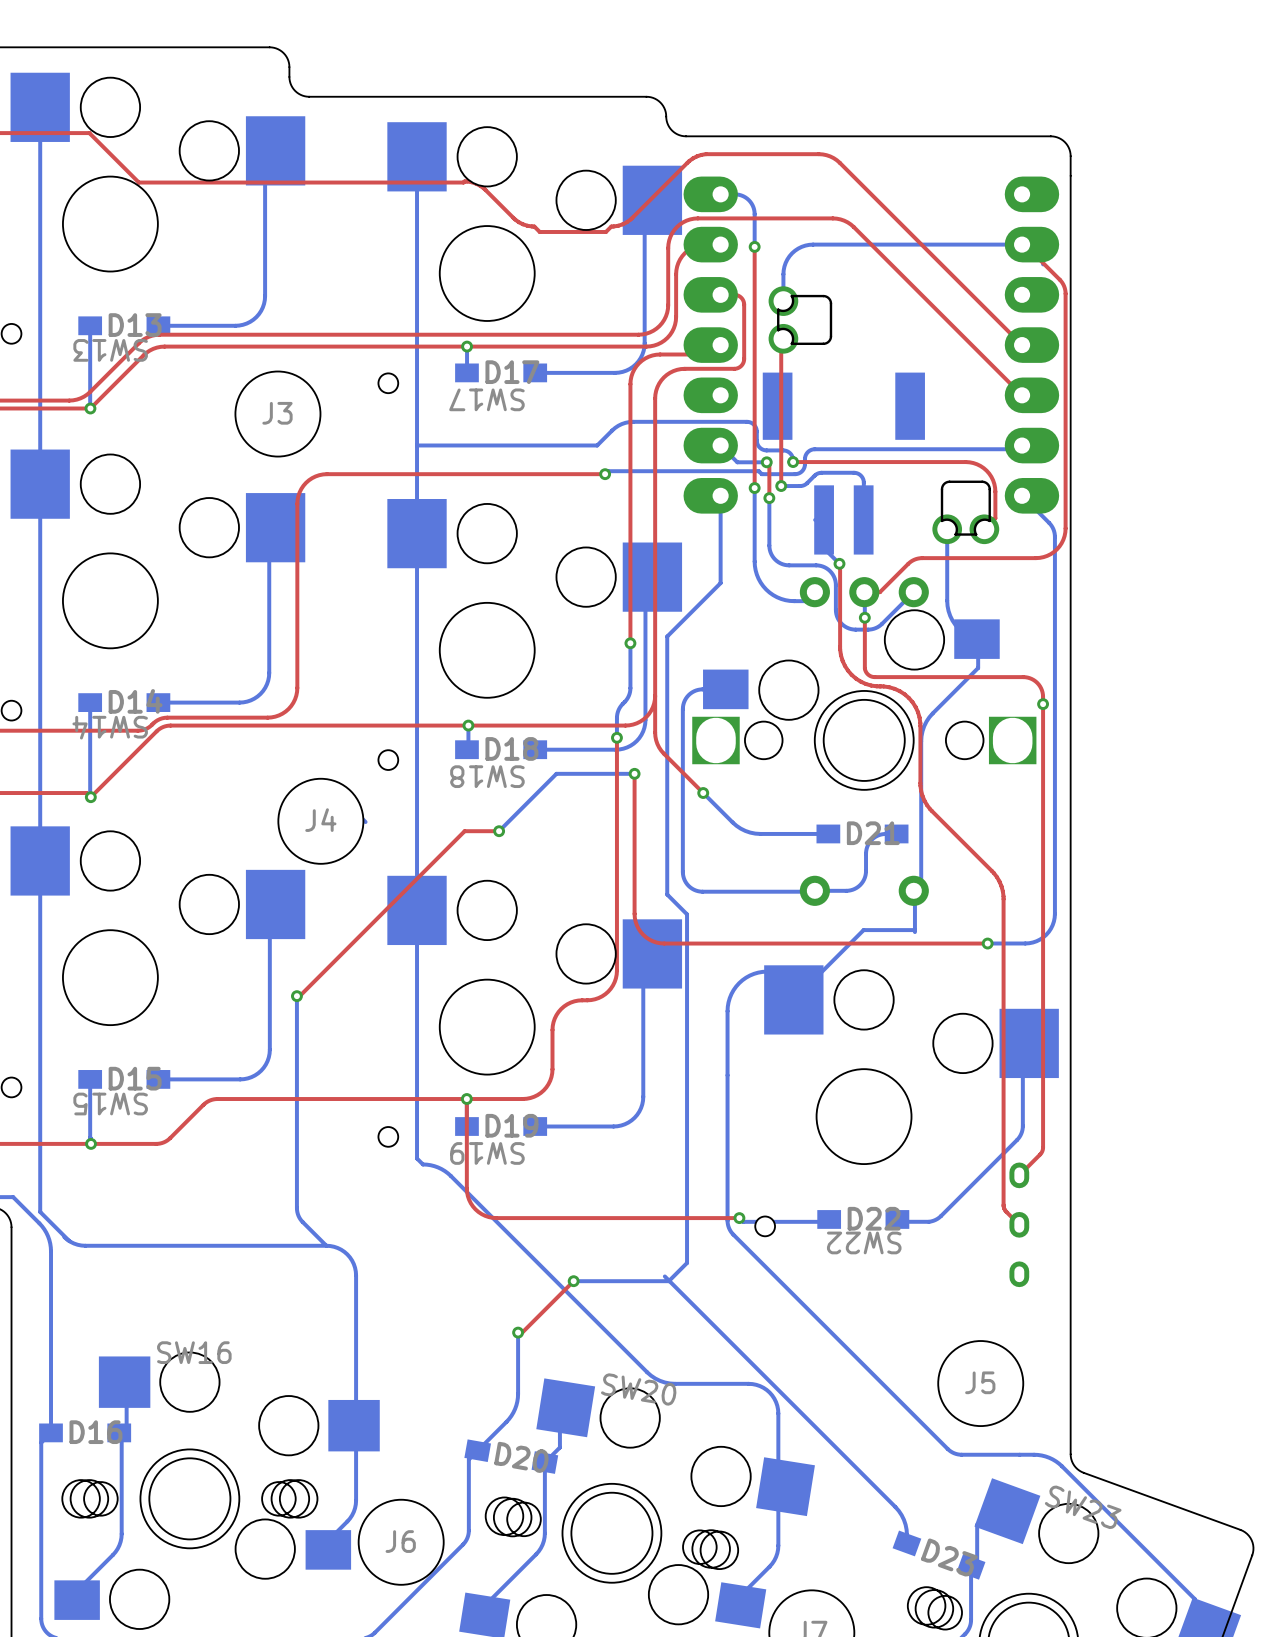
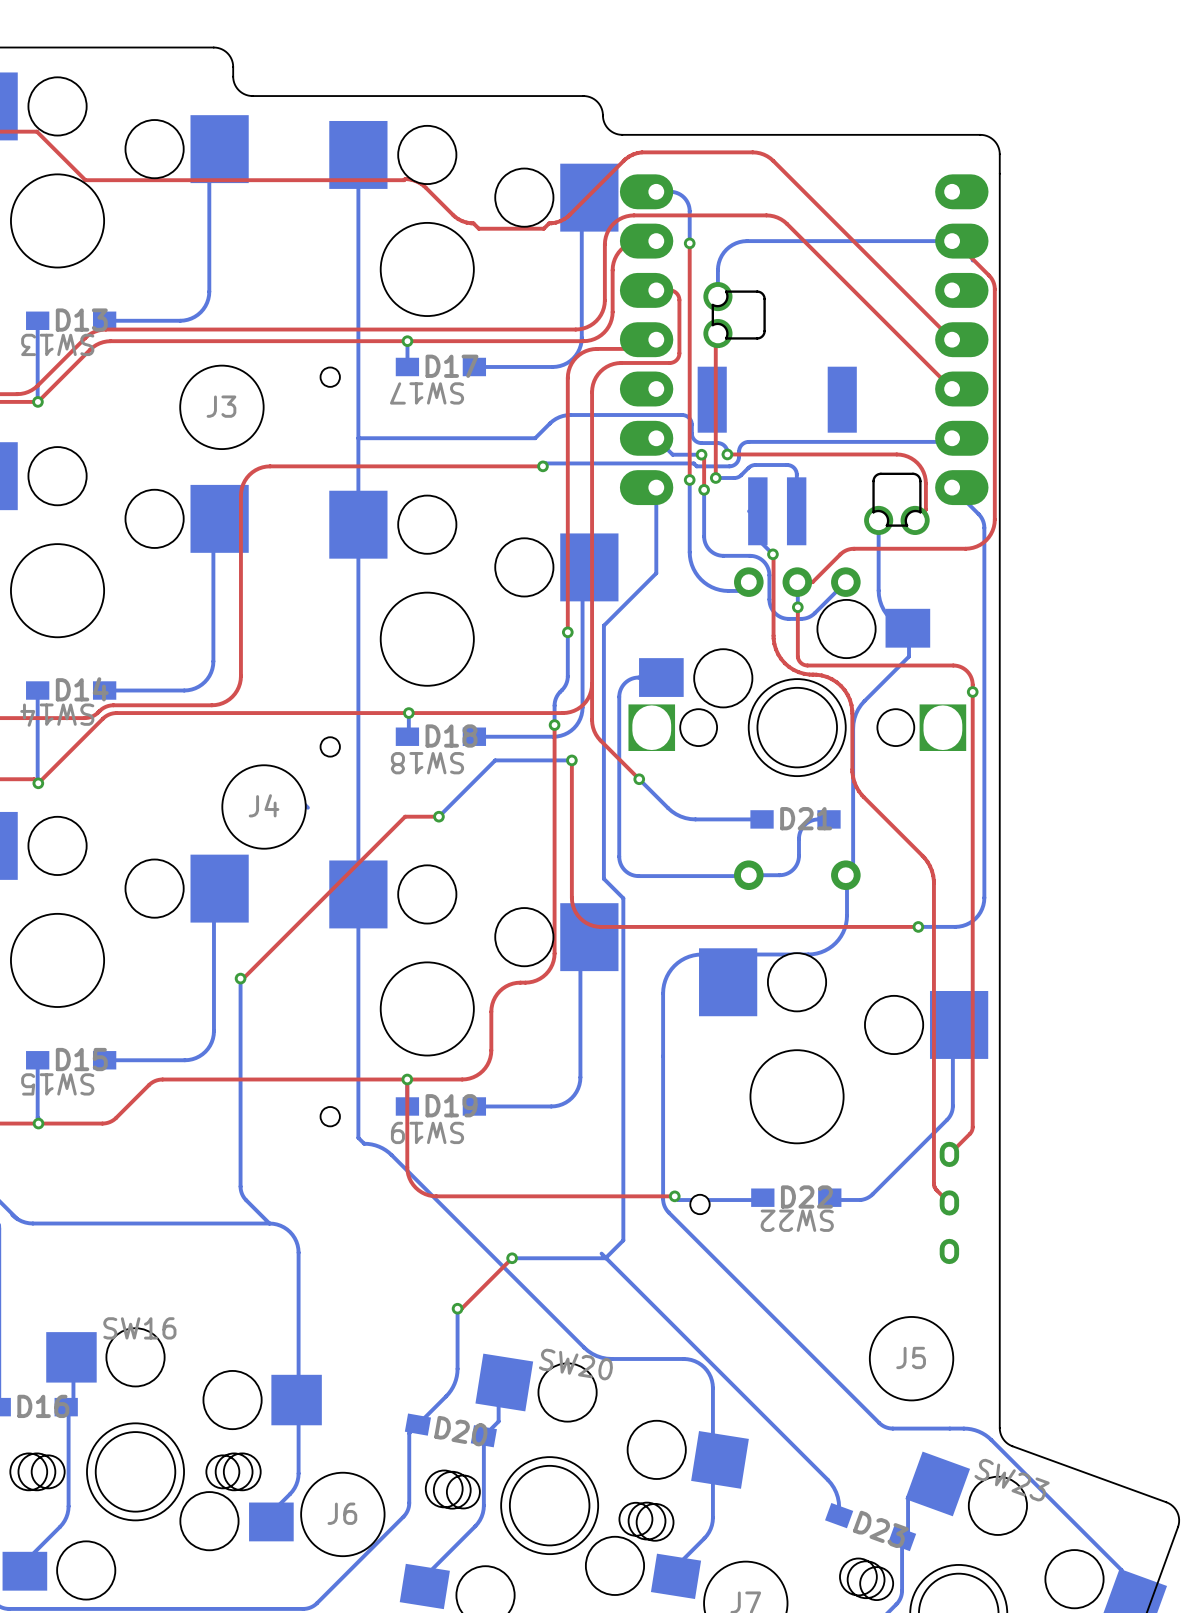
bottom track: (914, 930) (863, 930) (793, 999) -> none
bottom track: none -> (847, 915) (844, 928) (838, 939) (828, 948) (816, 953) (701, 954)

